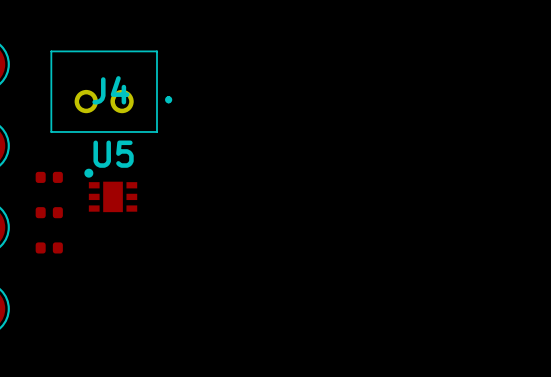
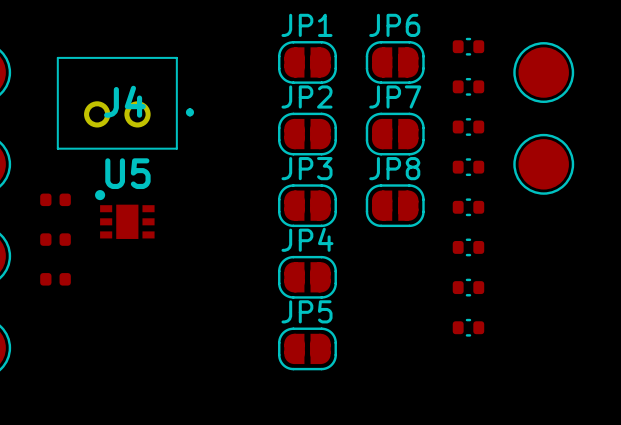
part: none -> (468, 46)
JP1: none -> (307, 62)
JP6: none -> (395, 62)
part: none -> (543, 72)
part: none -> (468, 86)
part: none -> (468, 127)
JP2: none -> (307, 134)
JP7: none -> (395, 134)
part: none -> (543, 164)
part: none -> (468, 167)
JP3: none -> (307, 205)
JP8: none -> (395, 205)
part: none -> (468, 207)
part: none -> (468, 247)
JP4: none -> (307, 277)
part: none -> (468, 287)
part: none -> (468, 327)
JP5: none -> (307, 348)

